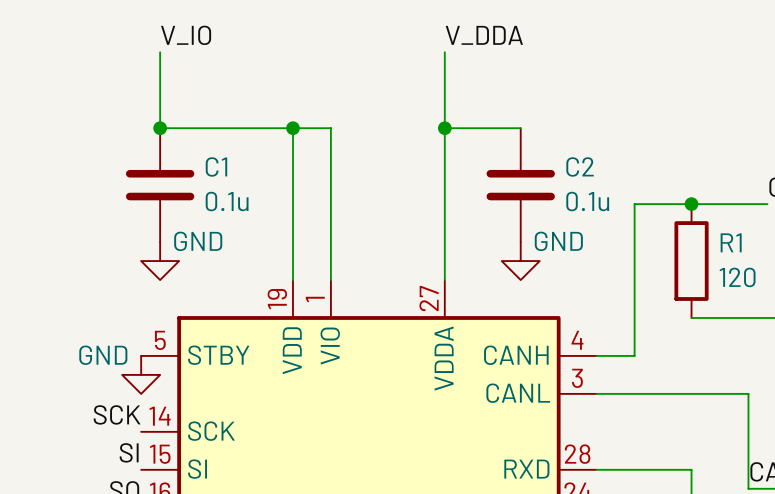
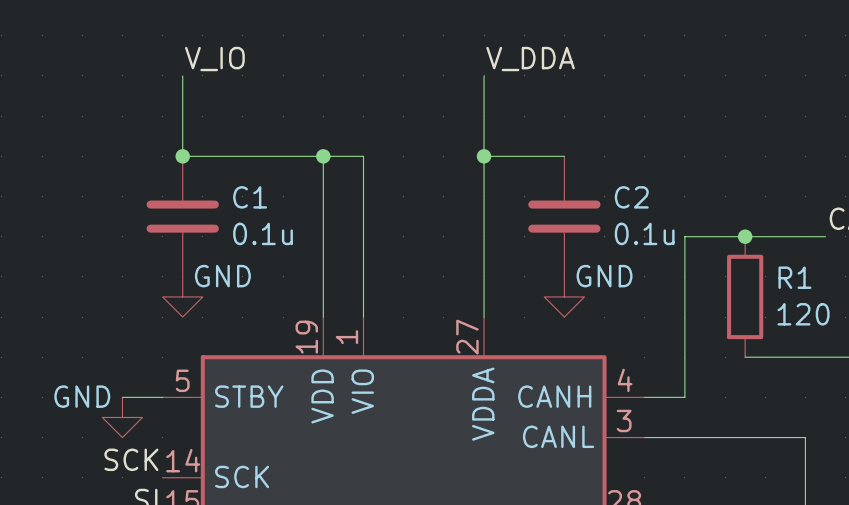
wire: none -> (122, 397) (162, 397)
power symbol position: GND (141, 374) -> GND (122, 417)

